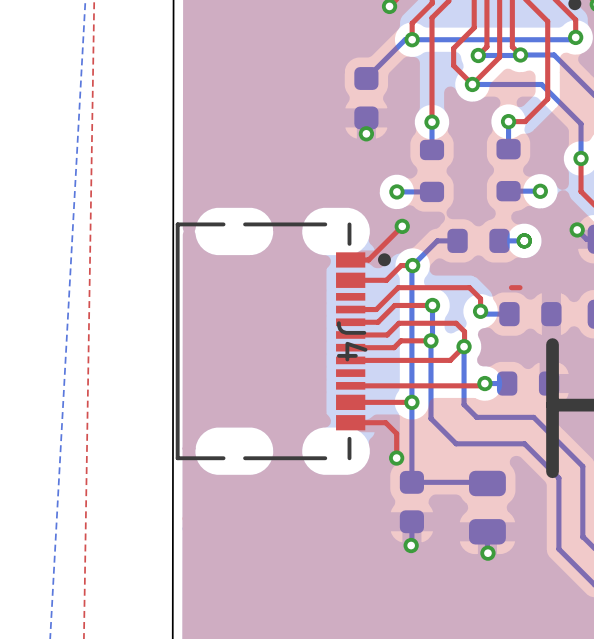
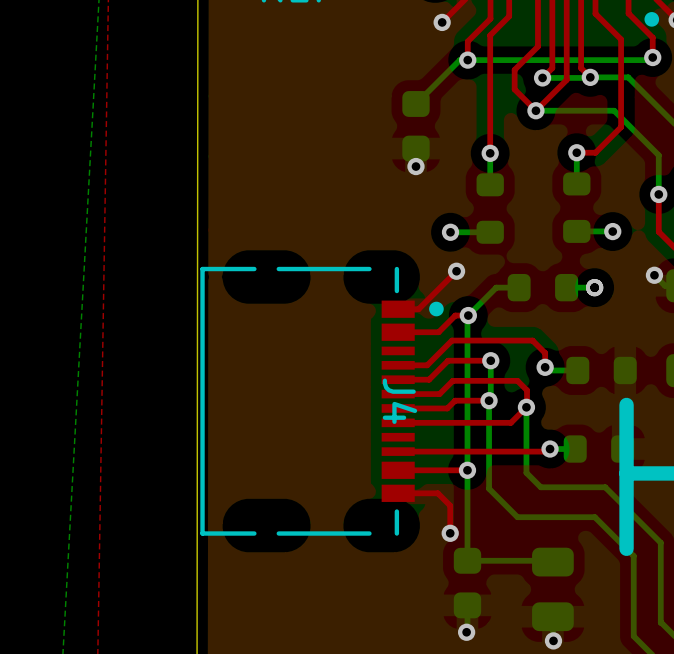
top track: (511, 287) (519, 287) -> none

